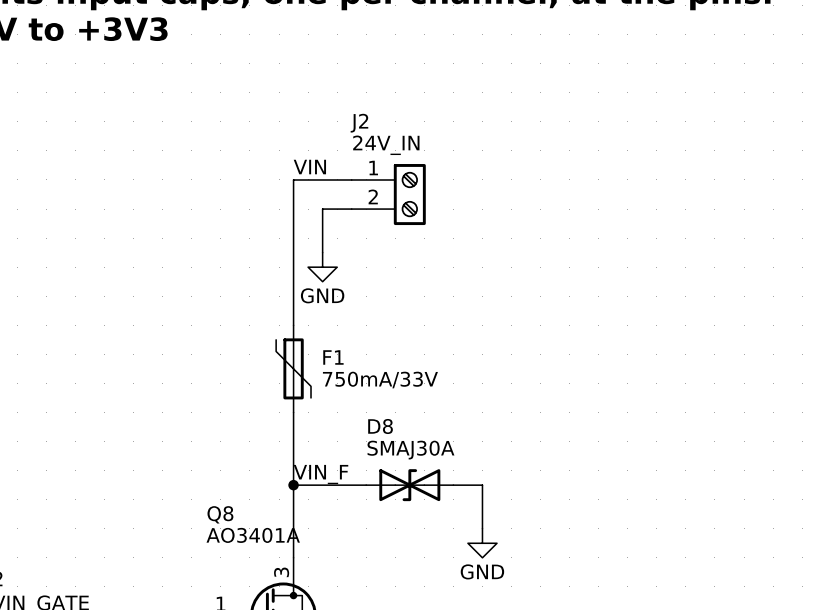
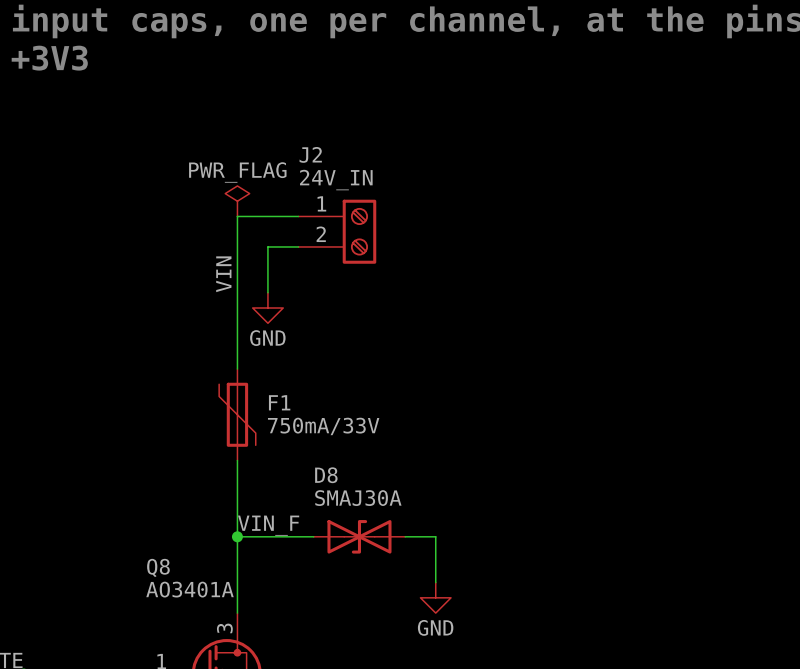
power symbol: none -> PWR_FLAG (237, 201)
label rotation: 0° (309, 167) -> 90° counterclockwise (223, 274)
label position: VIN (309, 167) -> VIN (223, 274)

